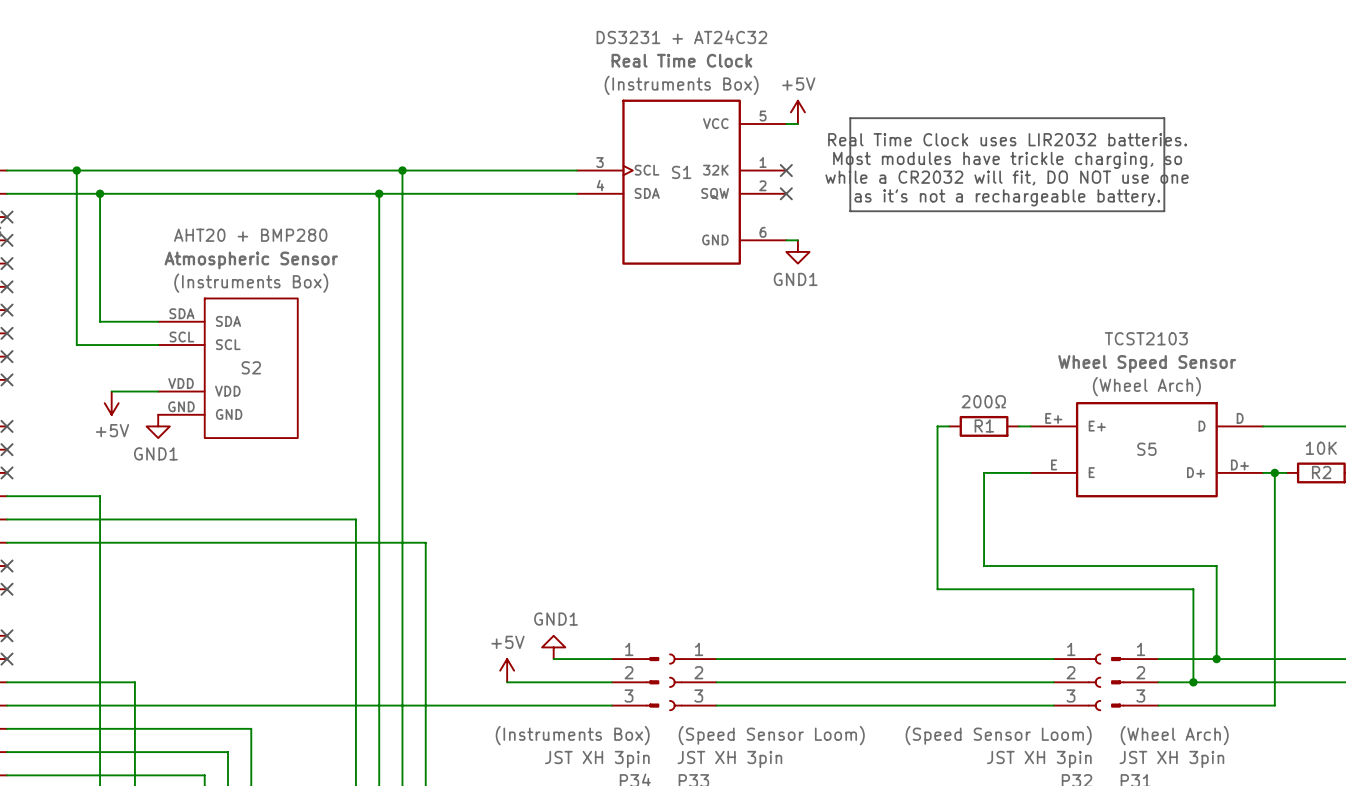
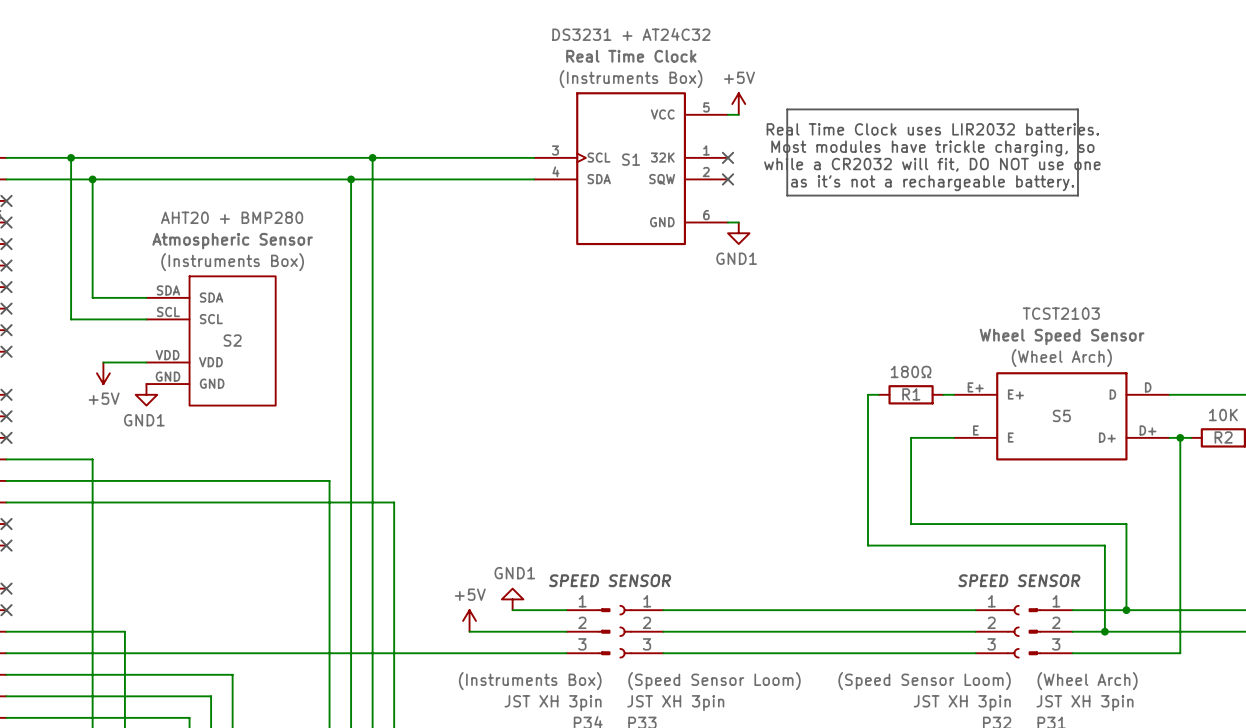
R1 value: 200Ω (983, 401) -> 180Ω (911, 371)
text: none -> SPEED SENSOR (610, 580)
text: none -> SPEED SENSOR (1019, 580)

